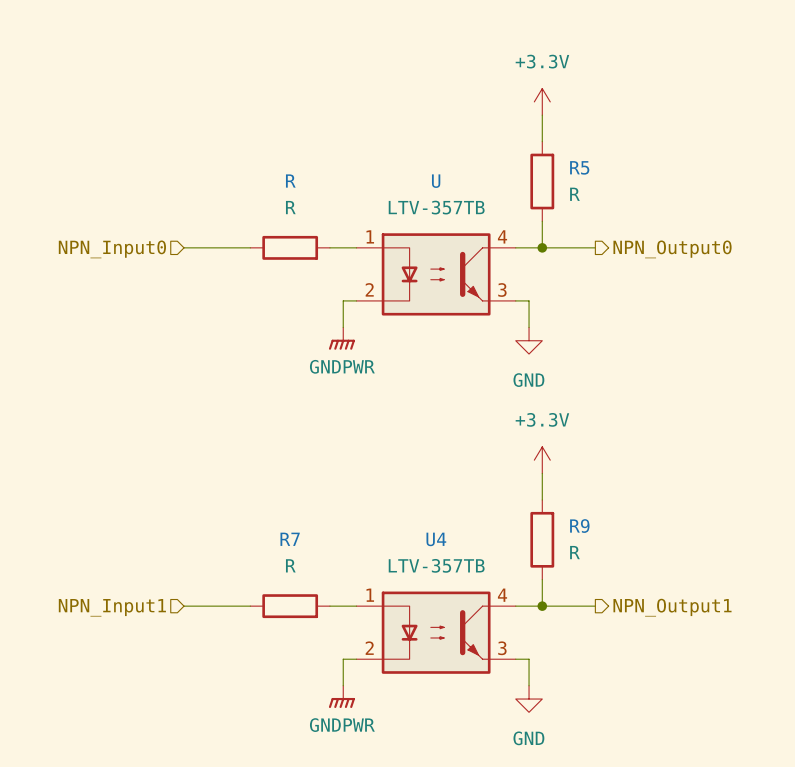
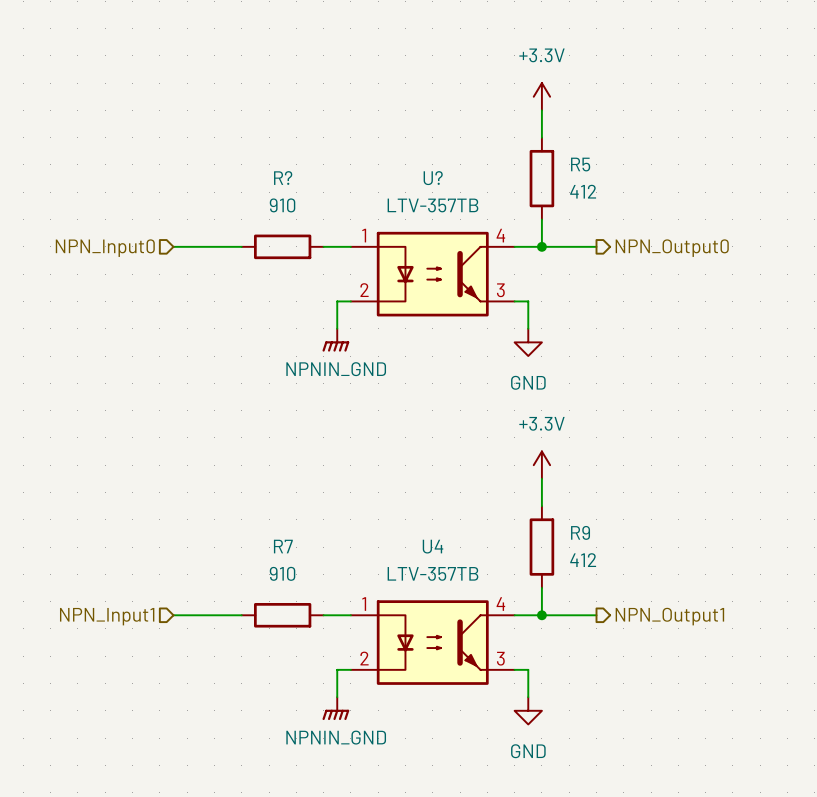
R name: R (290, 181) -> R? (283, 178)
U name: U (436, 181) -> U? (433, 178)
R5 value: R (574, 194) -> 412 (583, 191)
R value: R (290, 207) -> 910 (282, 205)
power symbol: GNDPWR (341, 338) -> NPNIN_GND (335, 340)
R9 value: R (574, 552) -> 412 (583, 560)
R7 value: R (290, 565) -> 910 (282, 573)
power symbol: GNDPWR (341, 696) -> NPNIN_GND (335, 708)

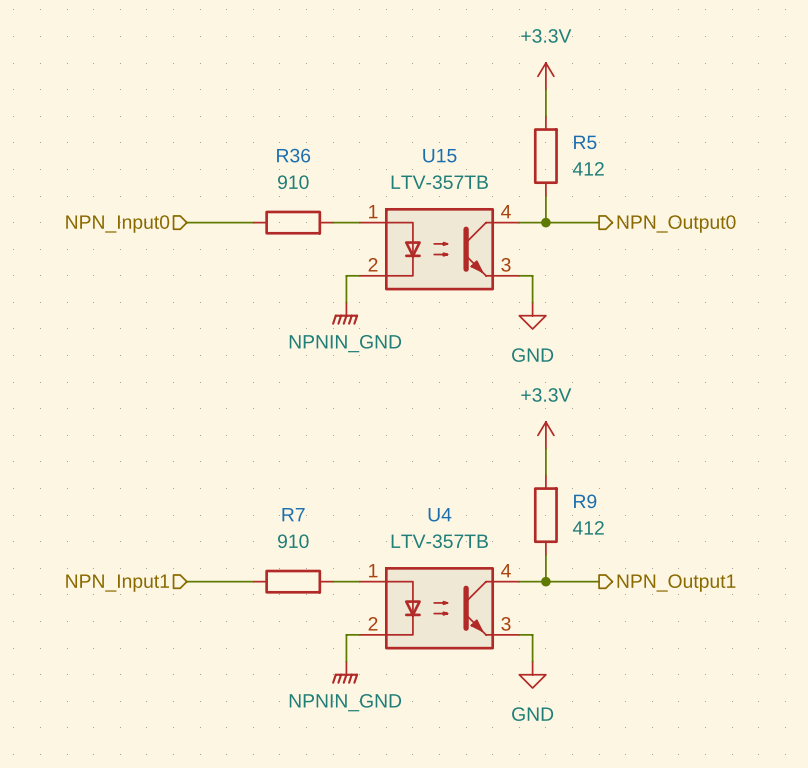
R? name: R? (283, 178) -> R36 (293, 155)
U? name: U? (433, 178) -> U15 (439, 155)

